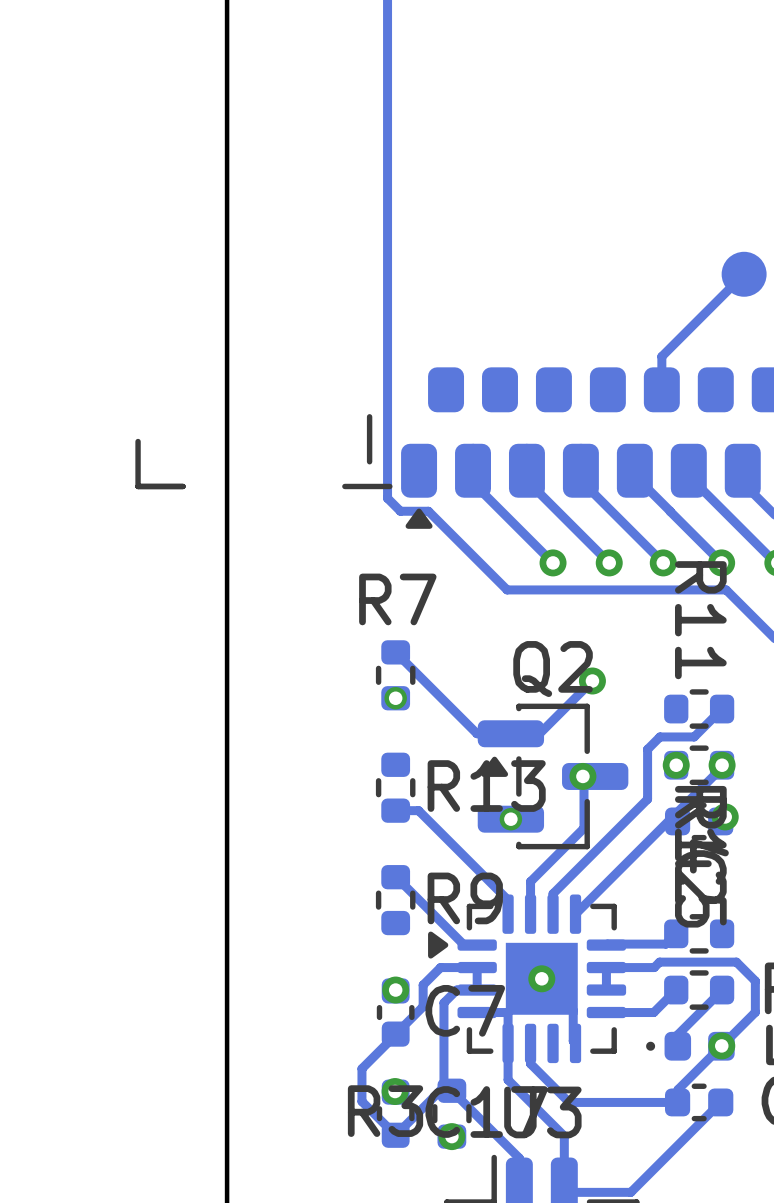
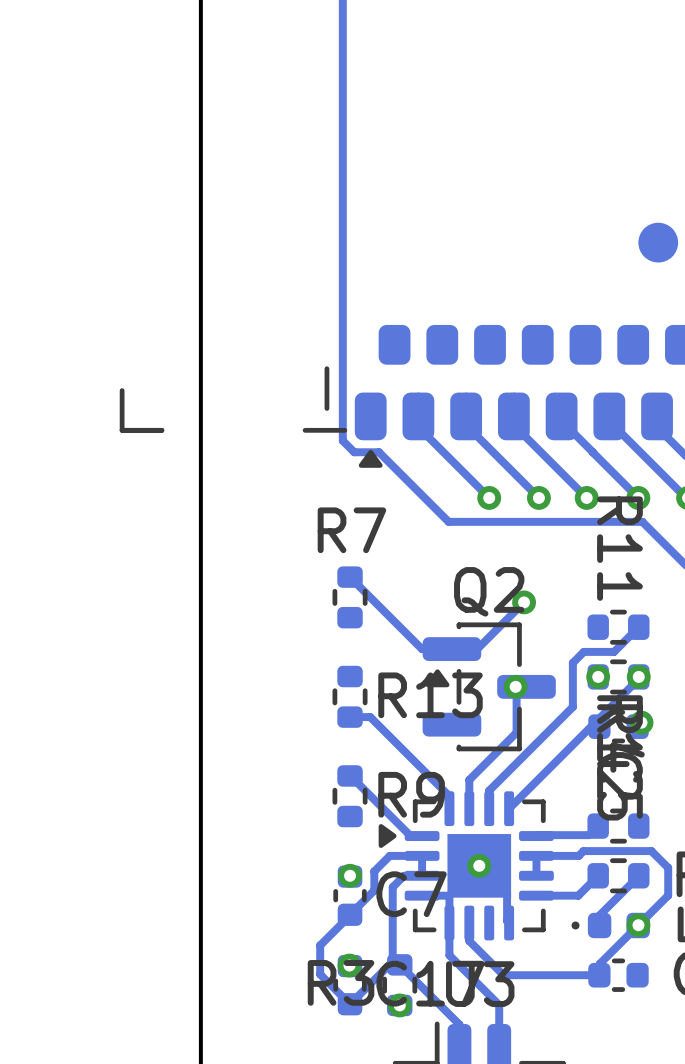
track: (744, 274) (661, 356) (661, 389) -> none
via: (395, 698) -> none
via: (510, 819) -> none
track: (720, 1102) (630, 1192) (564, 1192) -> none

